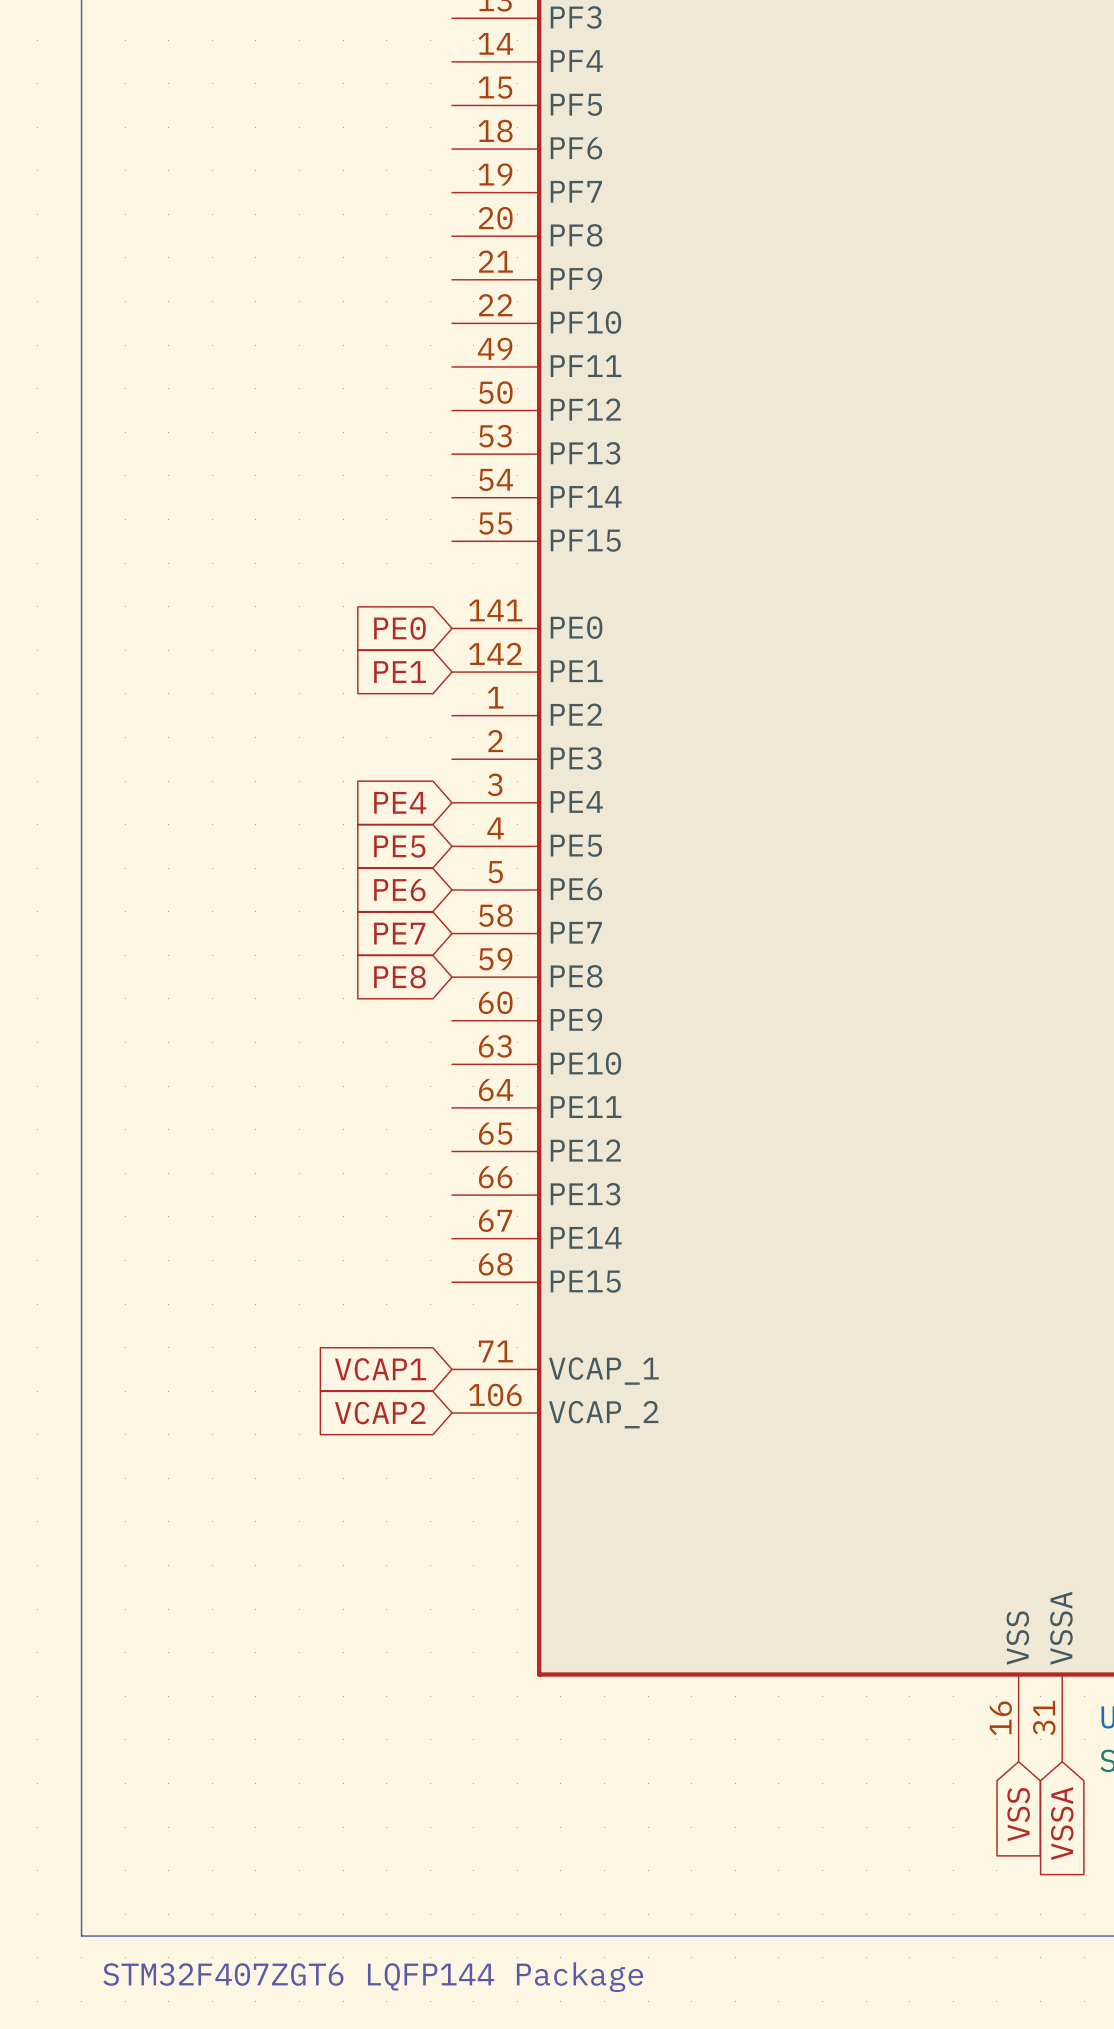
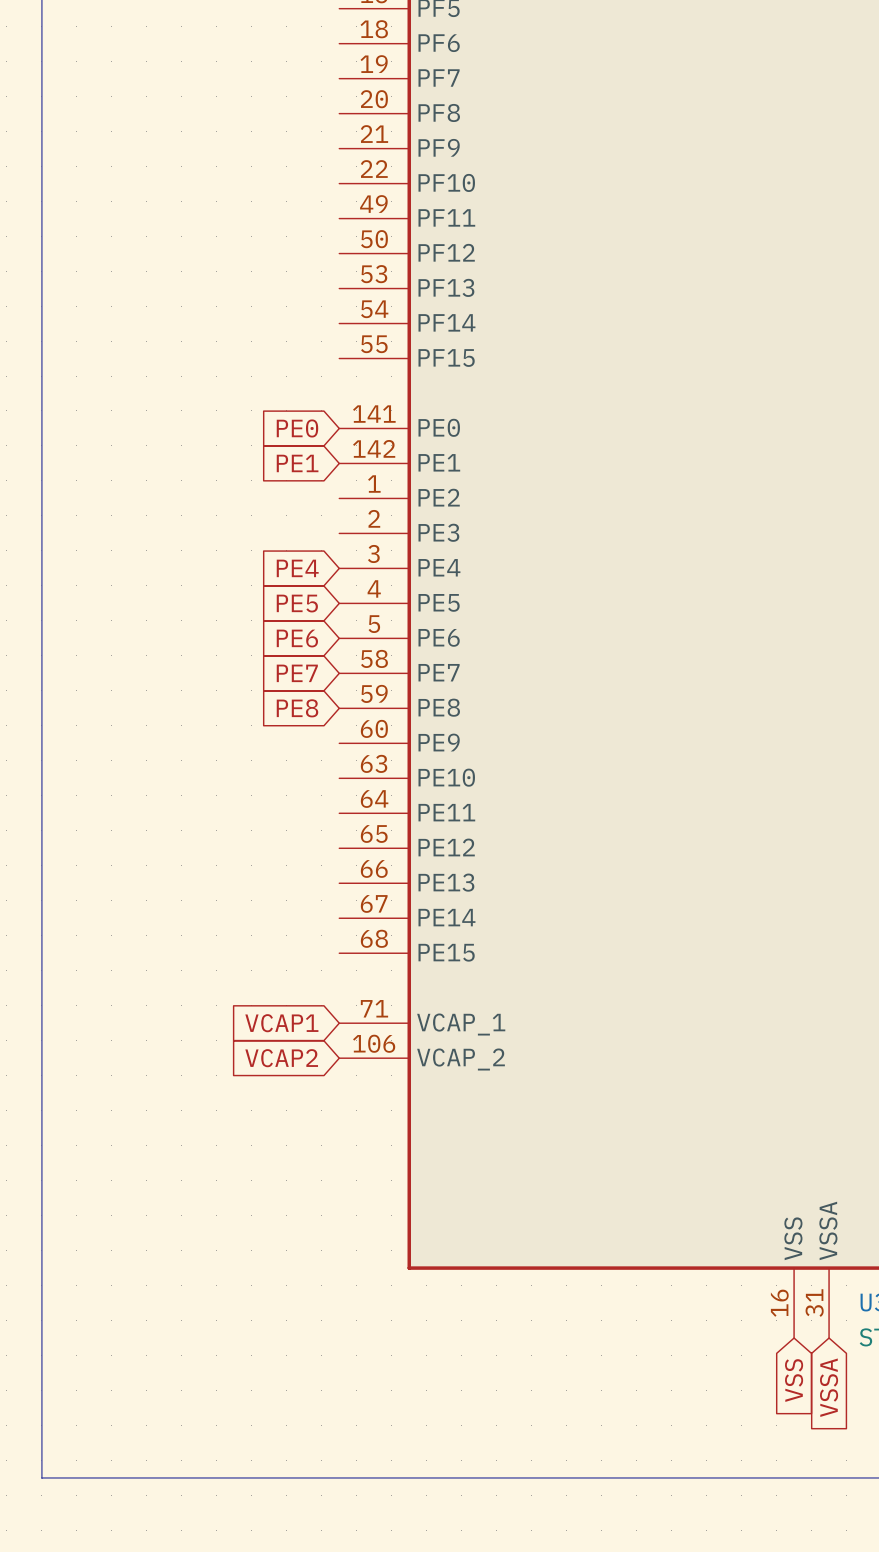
text: STM32F407ZGT6 LQFP144 Package (373, 1977) -> none

